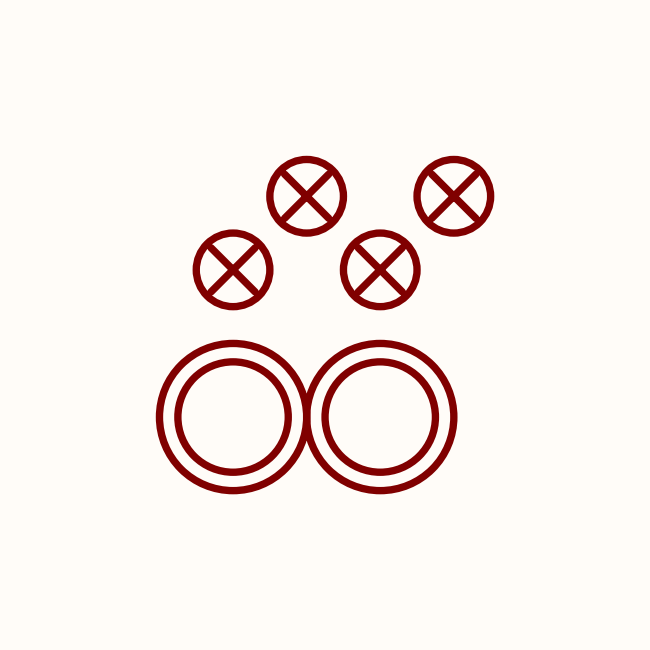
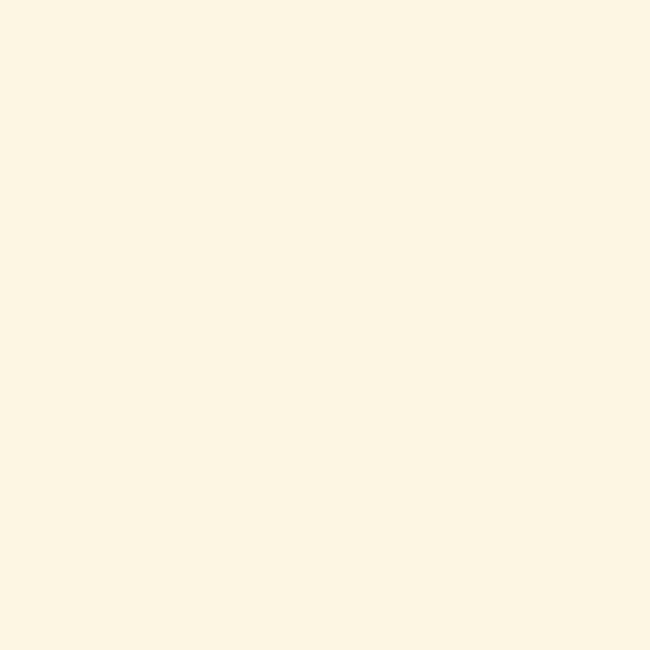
part: (306, 196) -> none
part: (453, 196) -> none
part: (233, 269) -> none
part: (380, 269) -> none
part: (233, 417) -> none
part: (380, 417) -> none

